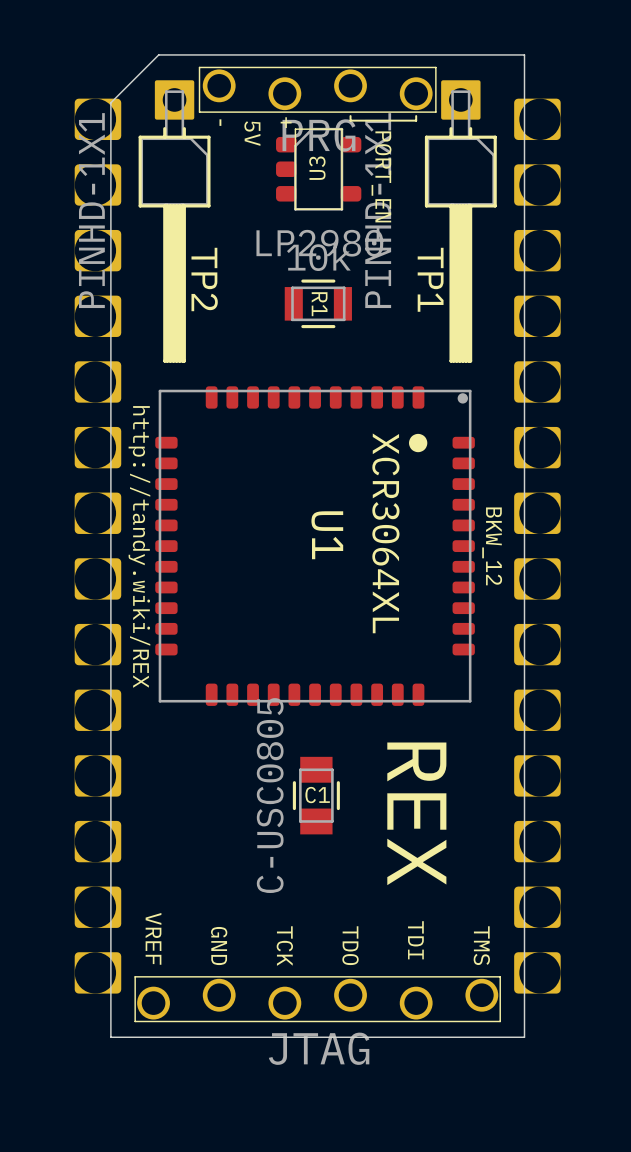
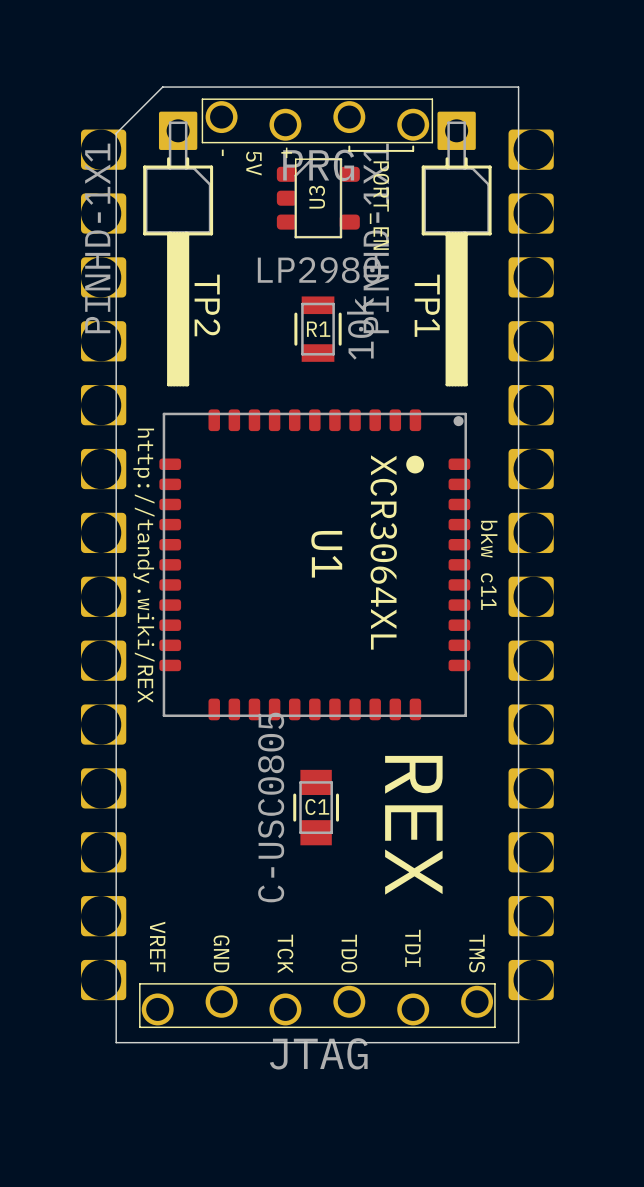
R1 rotation: 0° (318, 303) -> 90° clockwise (318, 329)
text: BKW_12 (492, 546) -> bkw c11 (489, 565)

